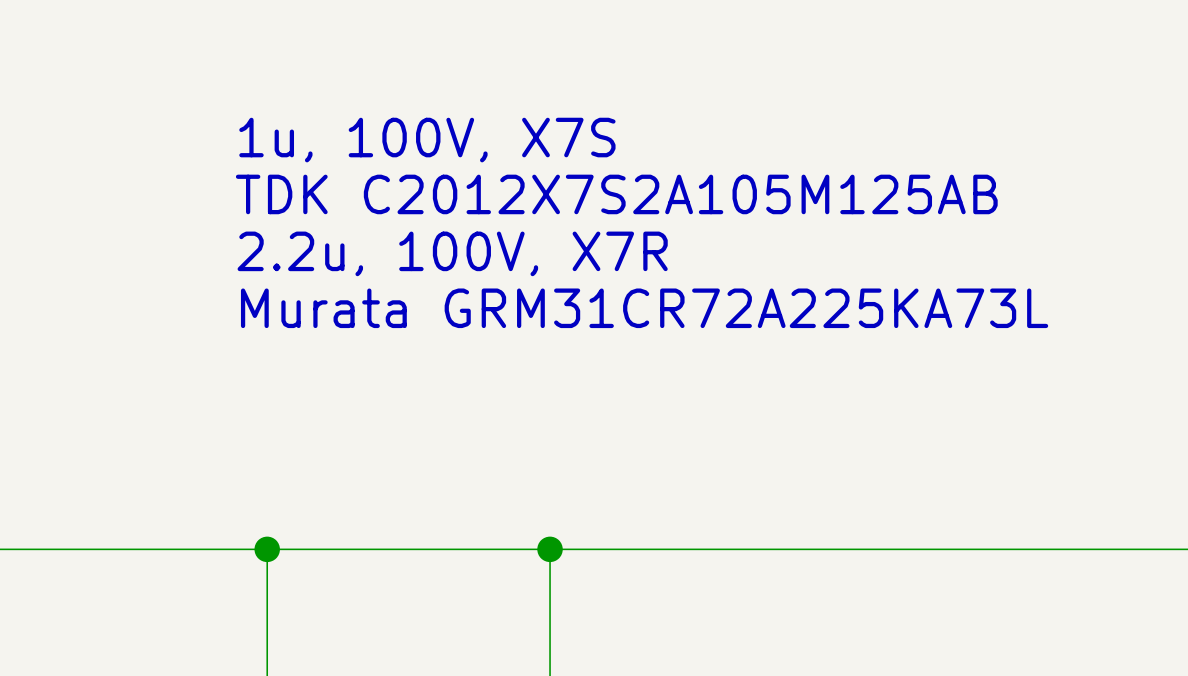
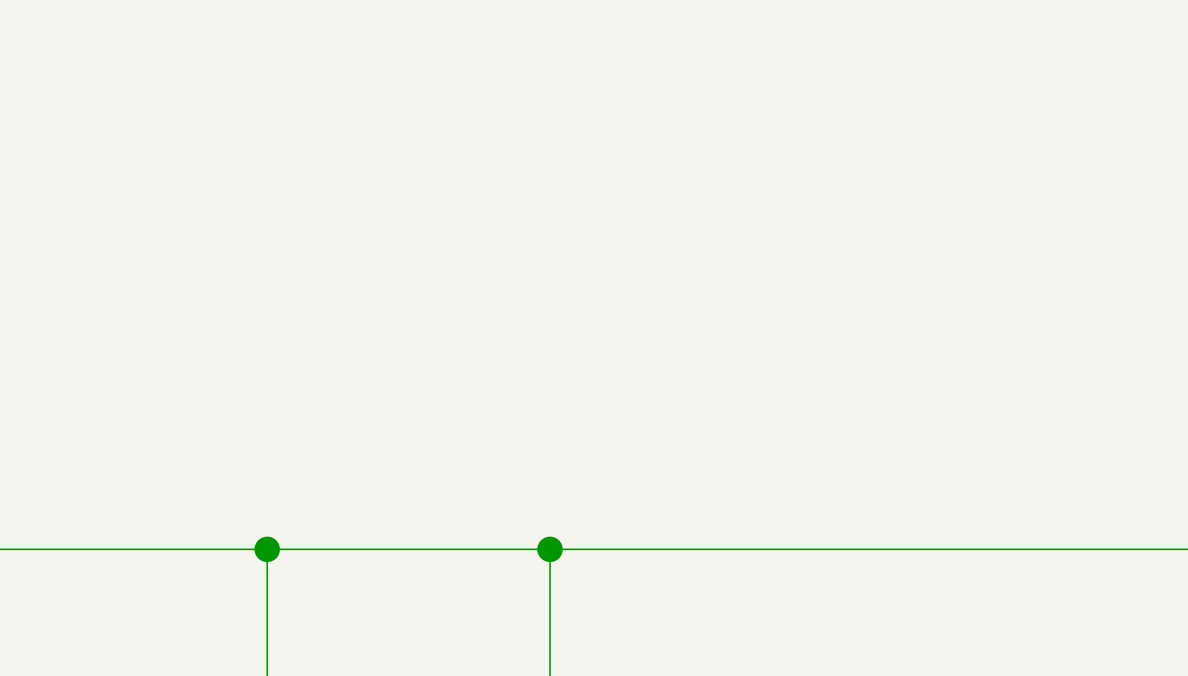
text: 1u, 100V, X7S (427, 140) -> none
text: TDK C2012X7S2A105M125AB (616, 194) -> none
text: 2.2u, 100V, X7R (452, 253) -> none
text: Murata GRM31CR72A225KA73L (644, 308) -> none

